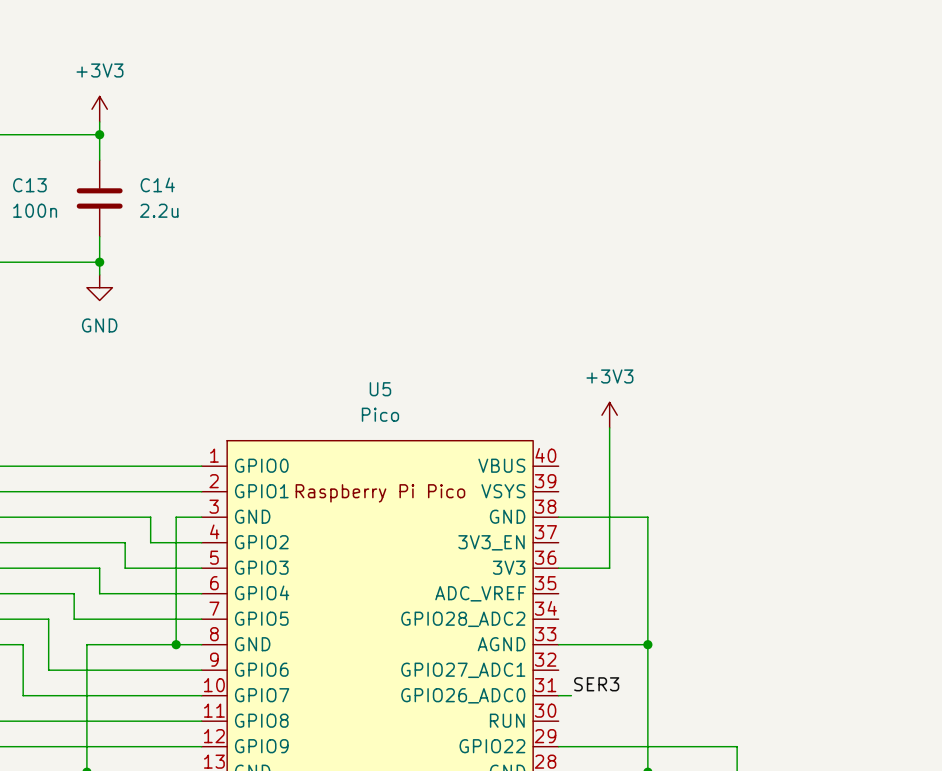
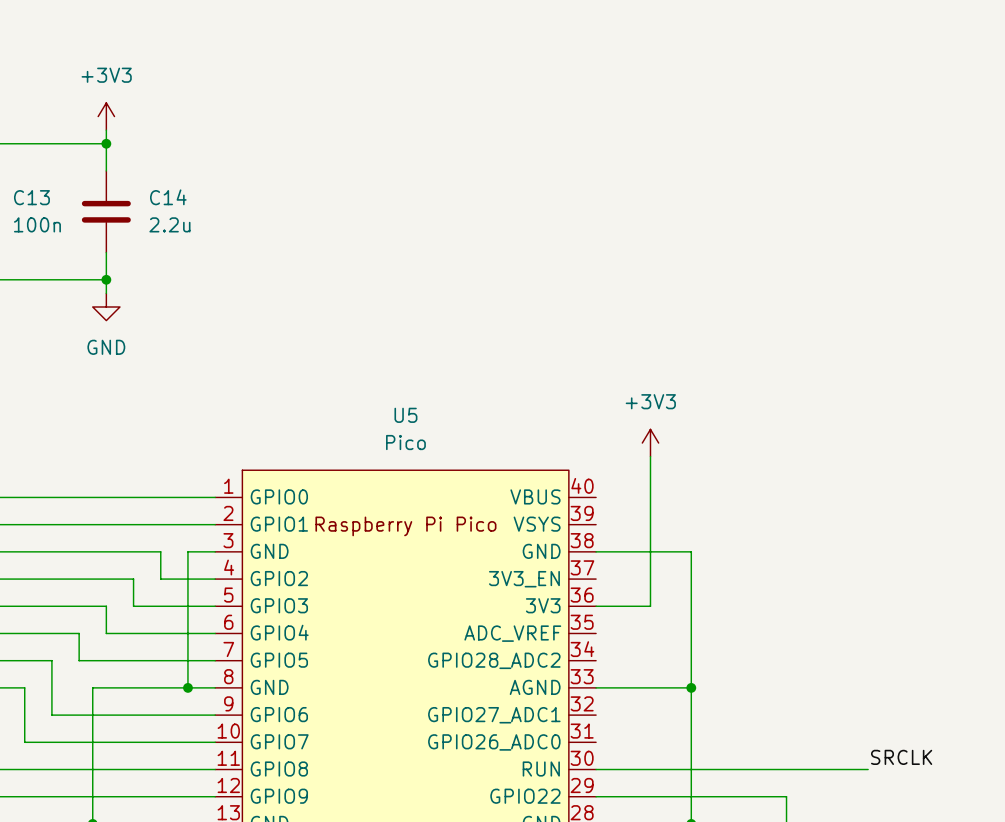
label: SER3 (596, 684) -> none
wire: (558, 695) (571, 695) -> none
label: none -> SRCLK (901, 757)
wire: none -> (596, 769) (868, 769)

